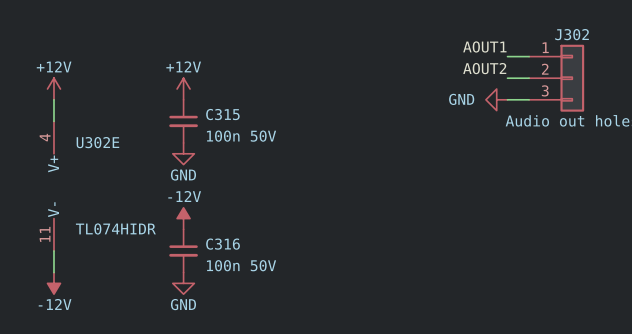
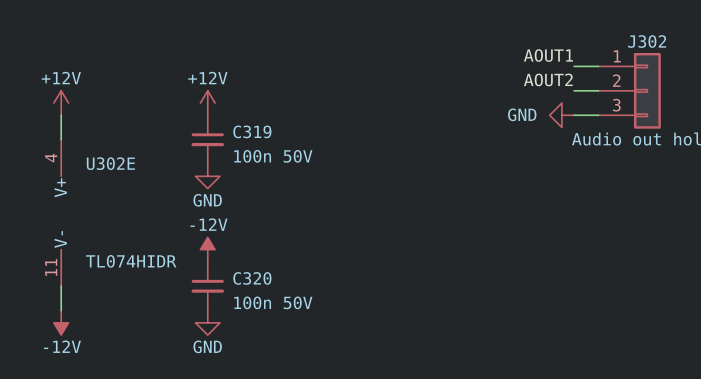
C315 name: C315 (222, 114) -> C319 (252, 131)
C316 name: C316 (223, 244) -> C320 (252, 278)

